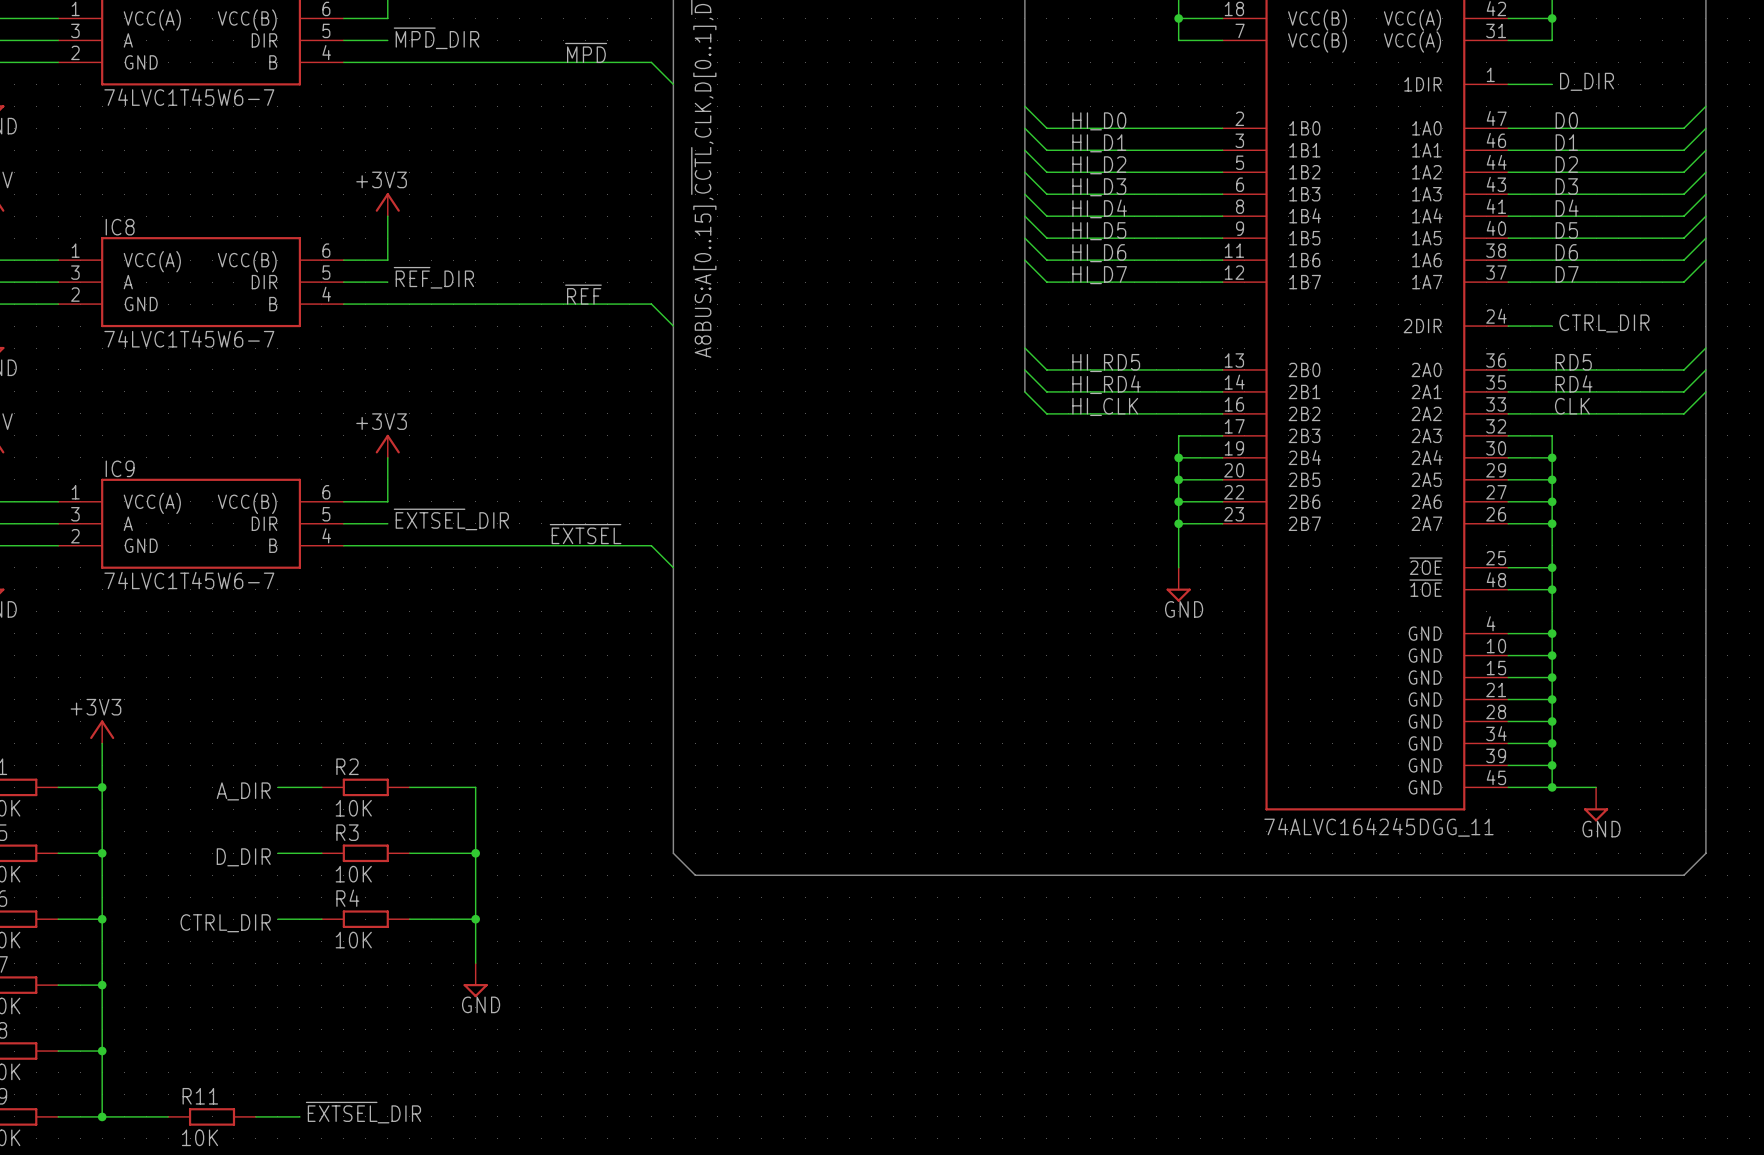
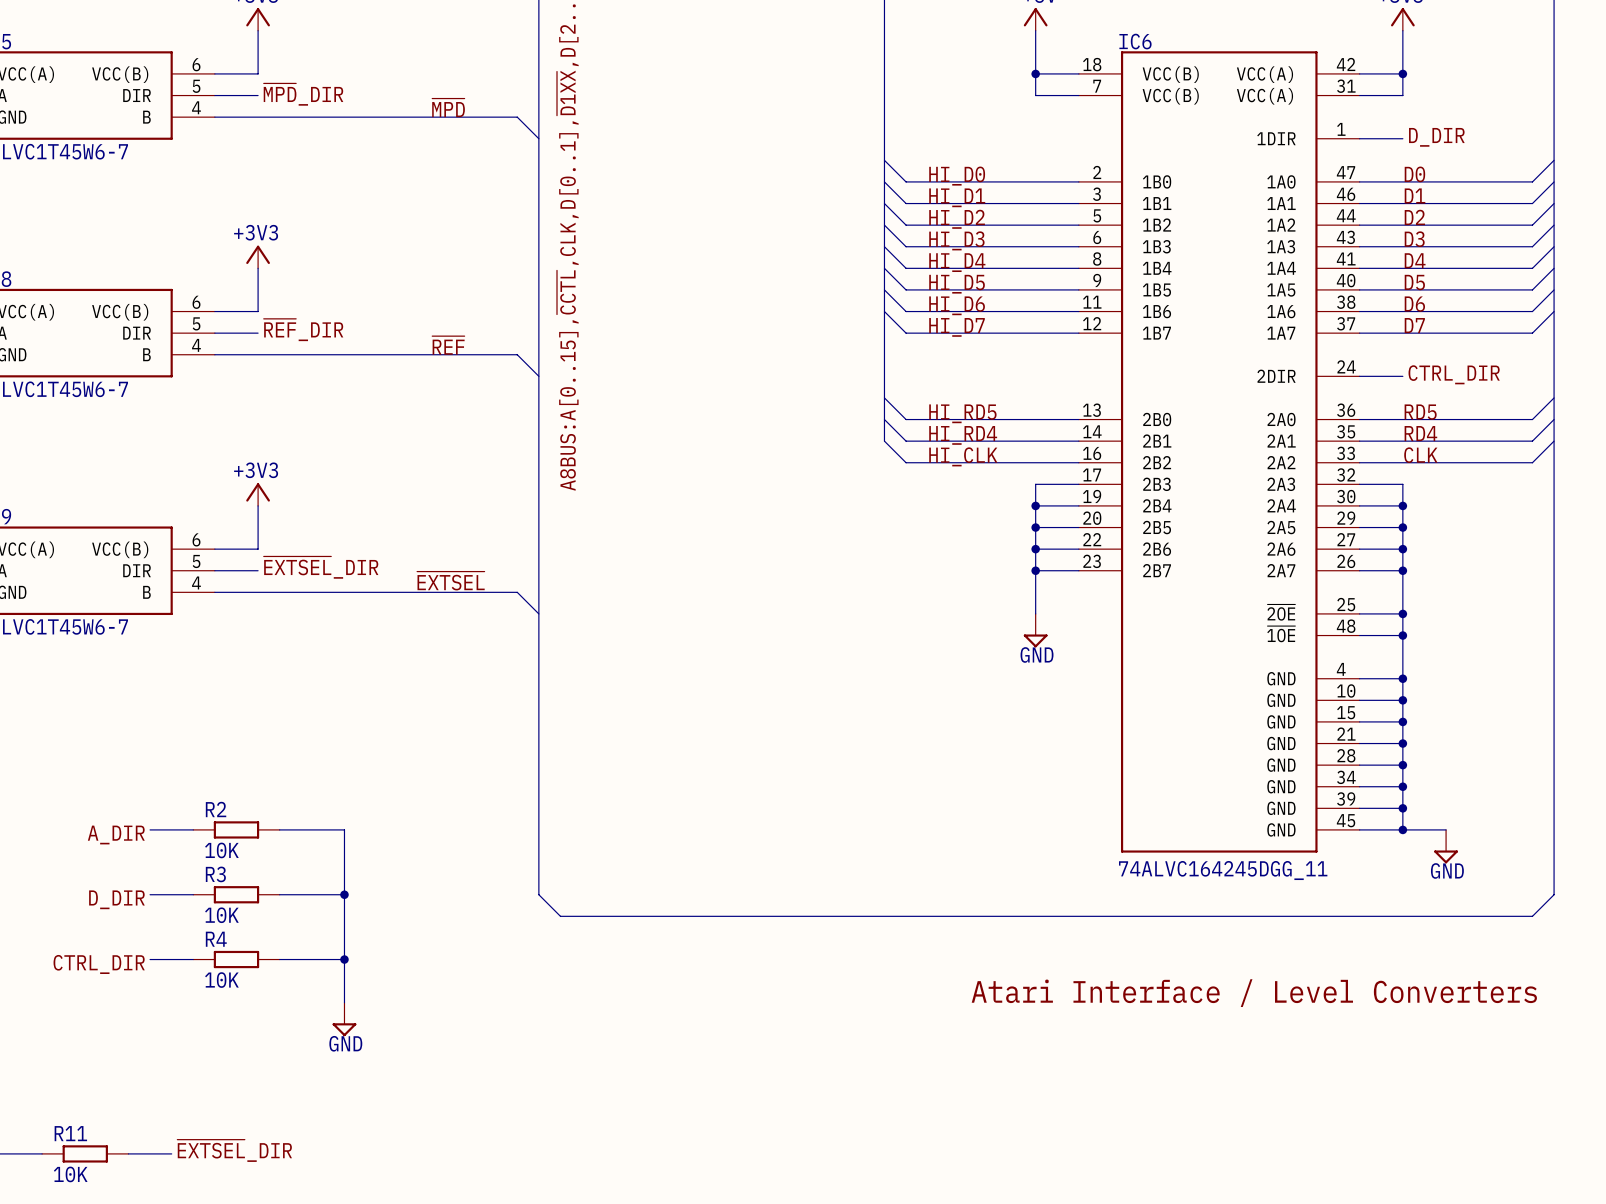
text: none -> Atari Interface / Level Converters (1254, 993)

